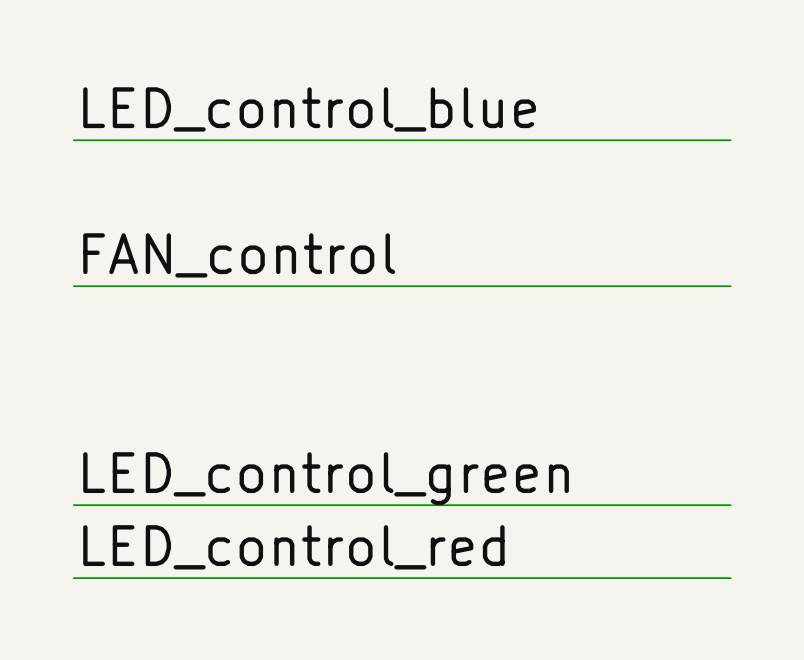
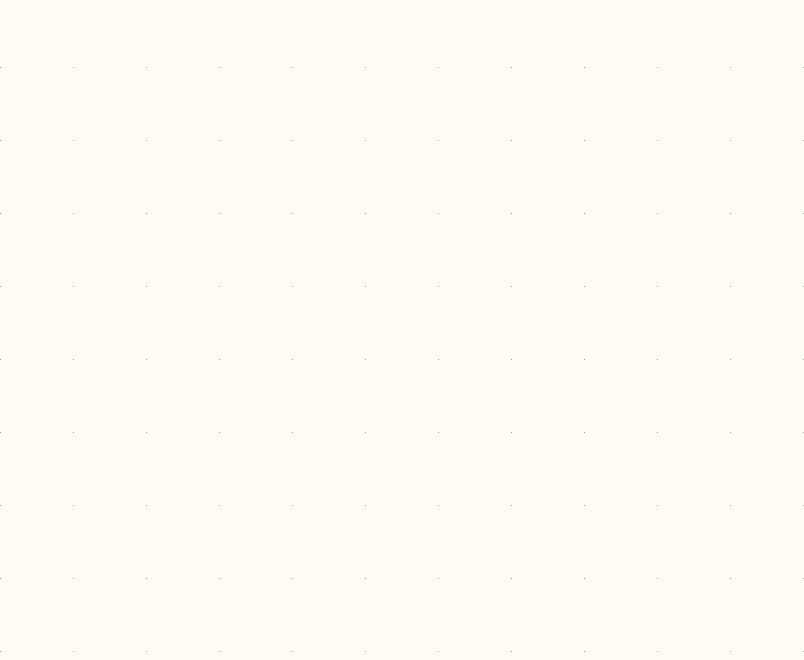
label: LED_control_blue (309, 109) -> none
wire: (73, 140) (730, 140) -> none
label: FAN_control (239, 255) -> none
wire: (73, 286) (730, 286) -> none
label: LED_control_green (326, 478) -> none
wire: (73, 505) (730, 505) -> none
label: LED_control_red (293, 547) -> none
wire: (73, 578) (730, 578) -> none

